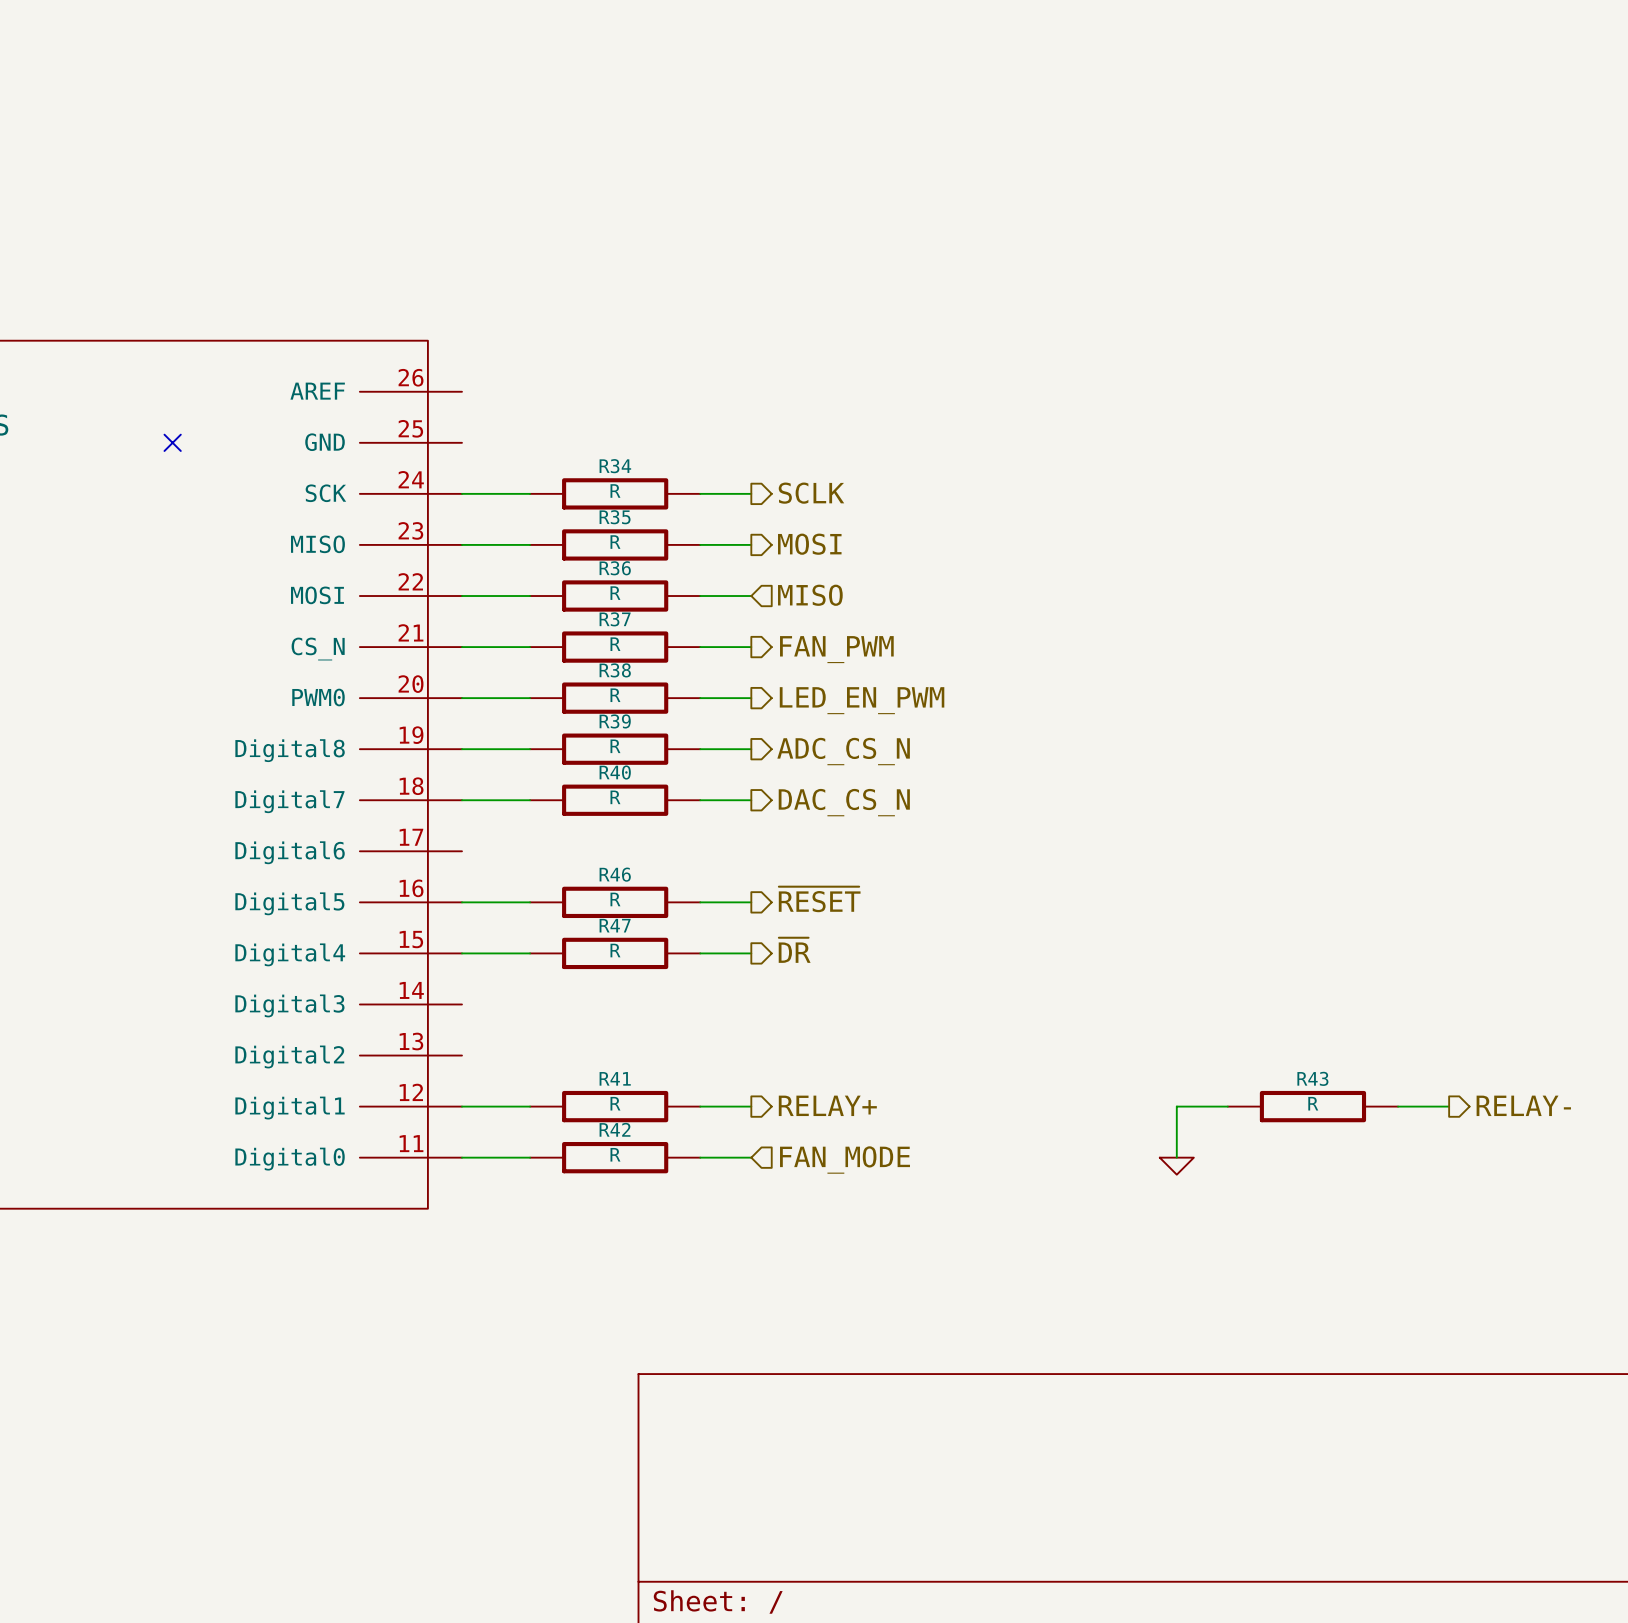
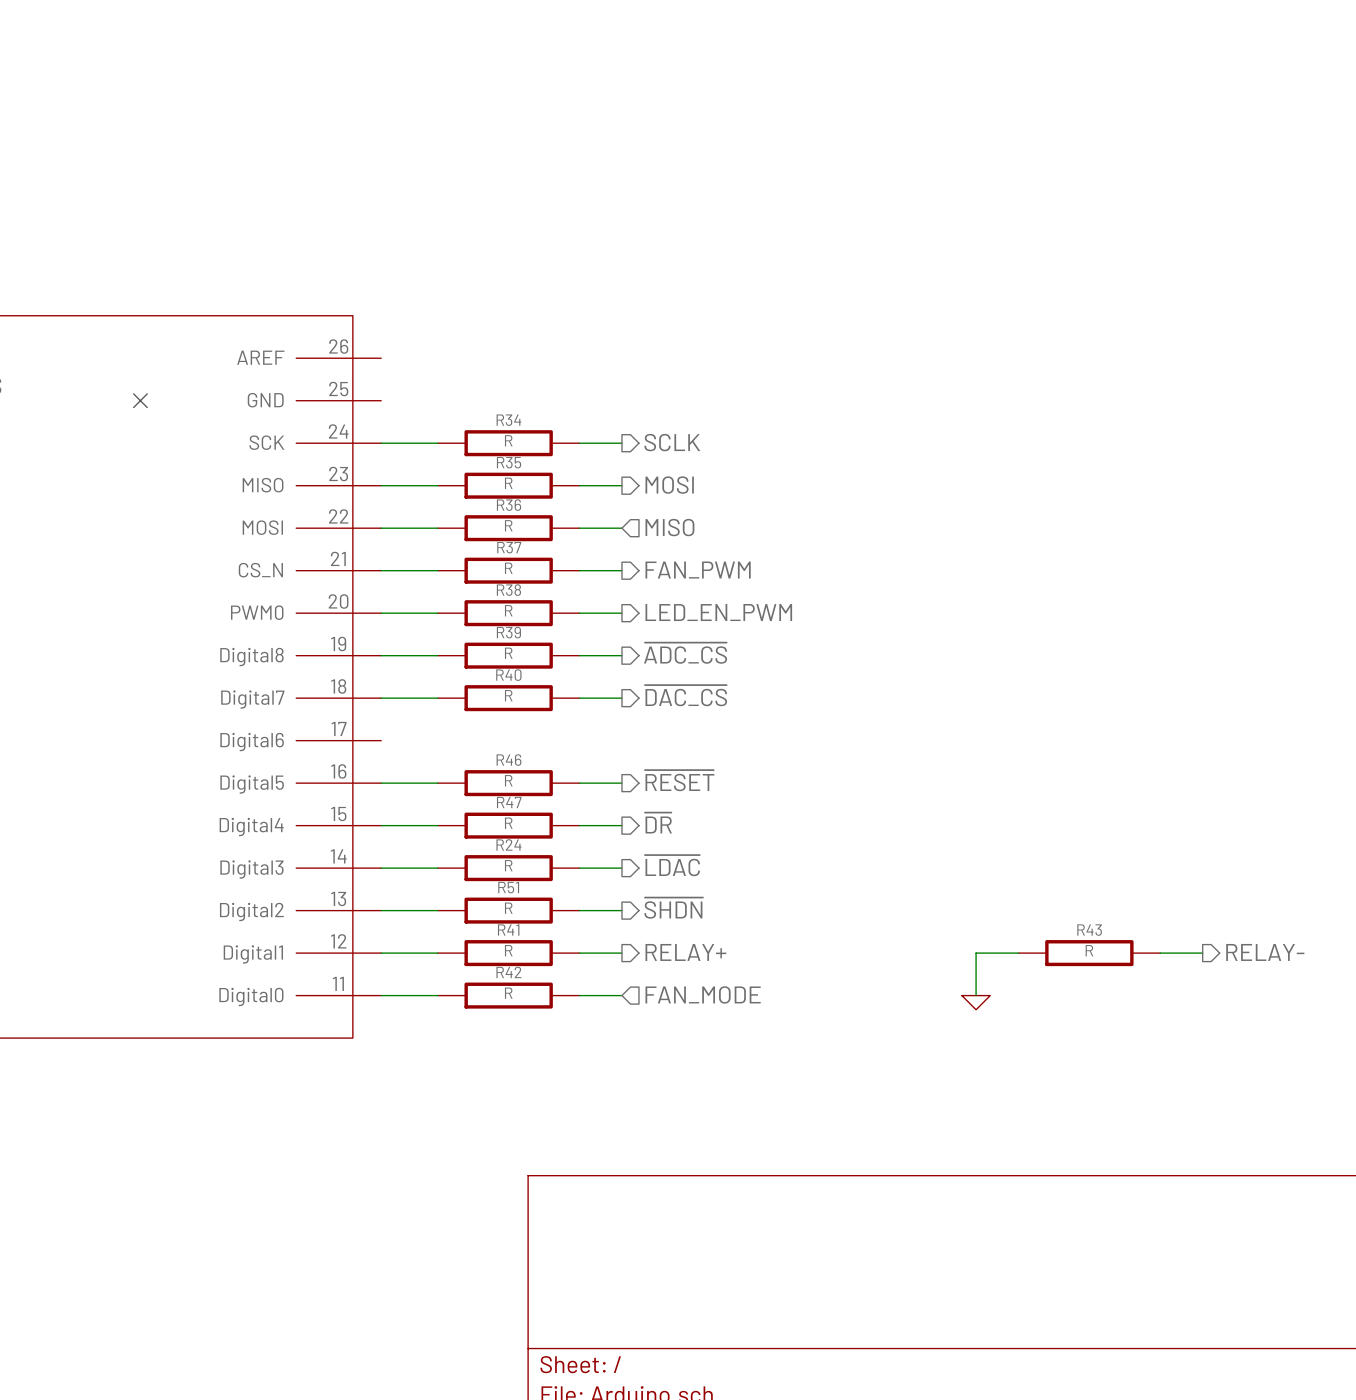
hierarchical label: ADC_CS_N (843, 751) -> ~{ADC_CS} (685, 653)
hierarchical label: DAC_CS_N (844, 802) -> ~{DAC_CS} (685, 695)
hierarchical label: none -> ~{LDAC} (672, 865)
wire: none -> (381, 868) (437, 868)
R24: none -> R (508, 868)
wire: none -> (579, 868) (621, 868)
hierarchical label: none -> ~{SHDN} (673, 908)
wire: none -> (381, 910) (437, 910)
R51: none -> R (508, 910)
wire: none -> (579, 910) (621, 910)

